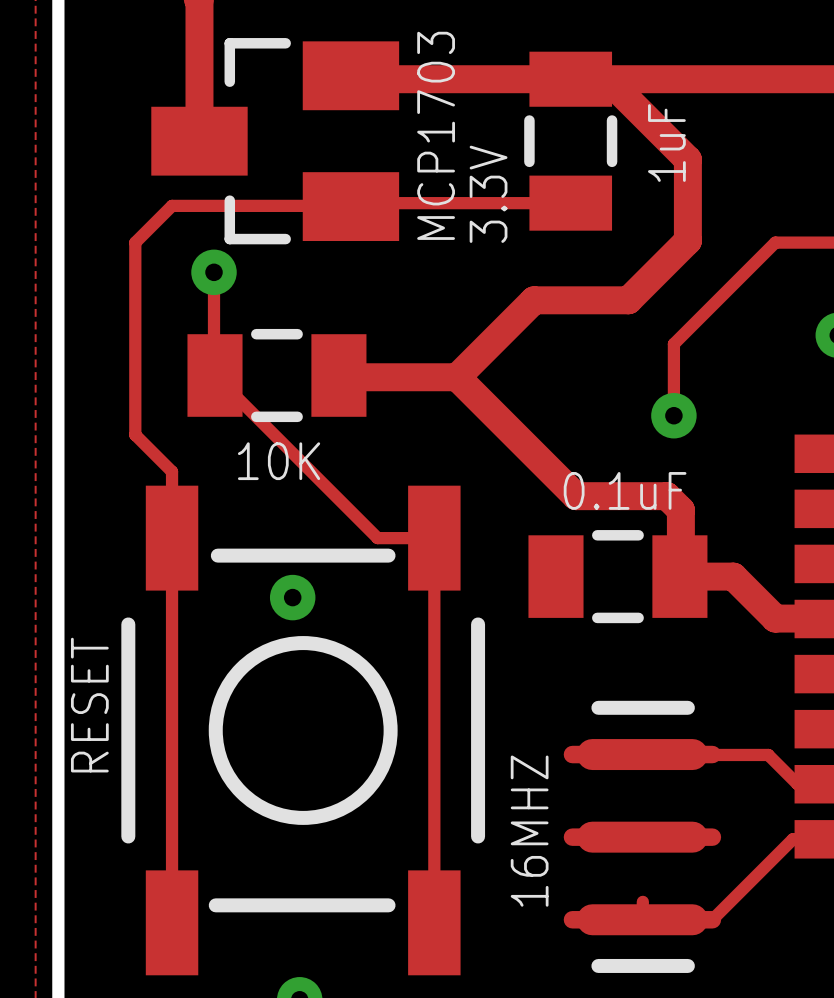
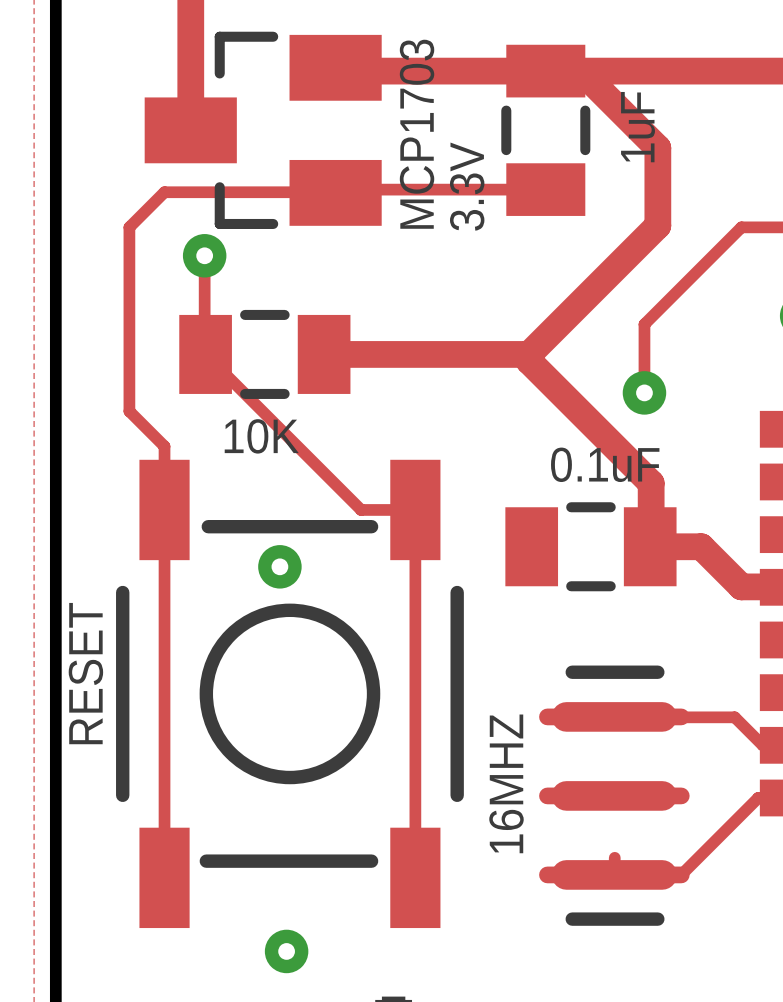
track: (628, 300) (534, 300) (457, 377) -> (600, 282) (529, 354)
track: (338, 375) (340, 377) (457, 377) -> (324, 354) (529, 354)
track: (457, 377) (575, 496) (666, 496) -> (529, 354) (529, 361) (637, 469)

